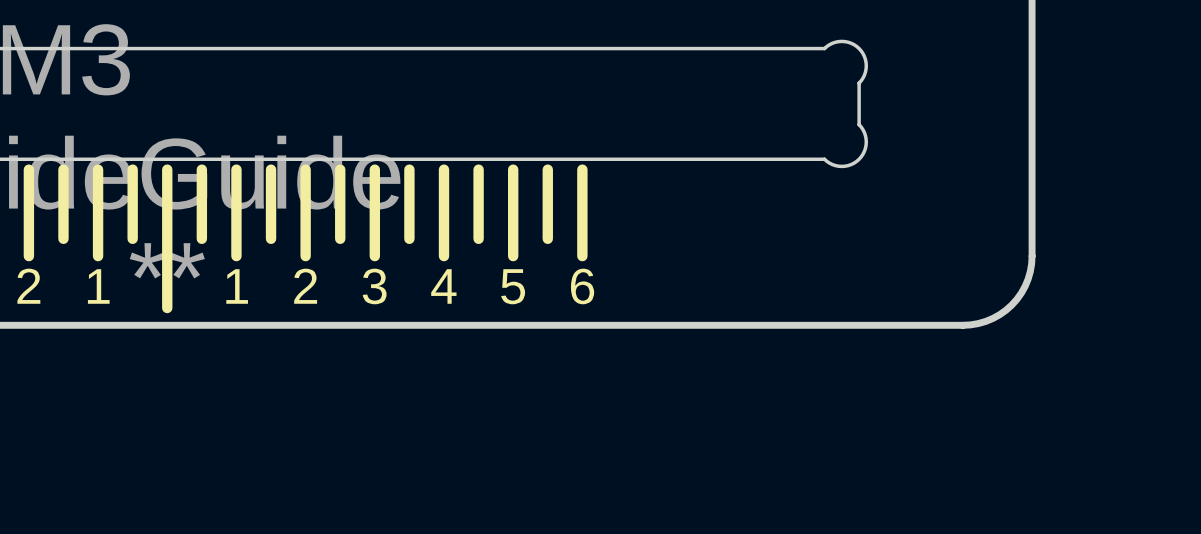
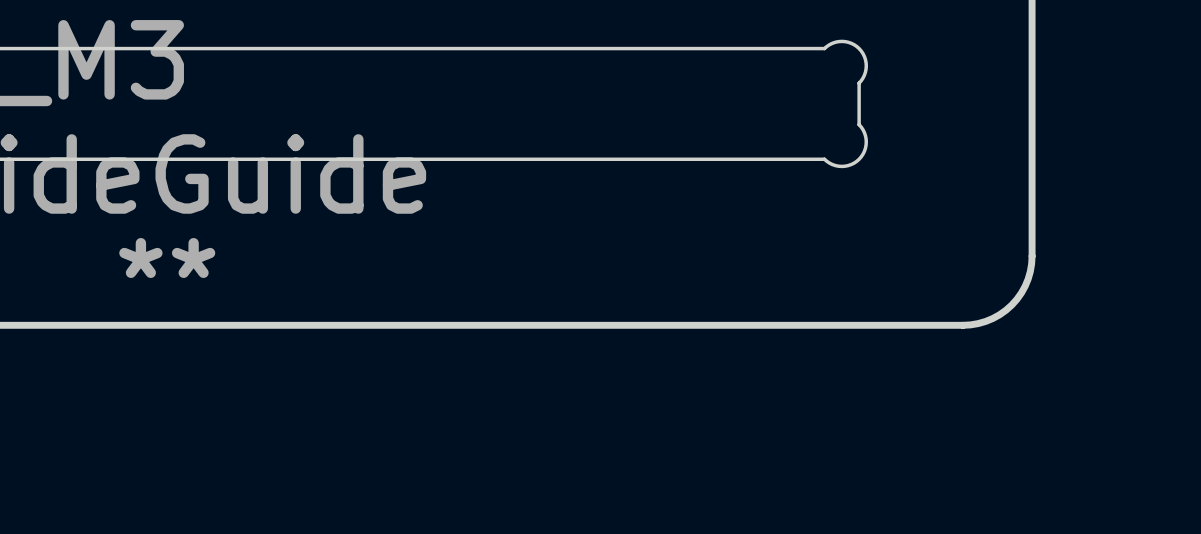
line: (28, 169) (28, 256) -> none
line: (63, 169) (63, 238) -> none
line: (98, 169) (98, 256) -> none
line: (132, 169) (132, 238) -> none
line: (167, 169) (167, 308) -> none
line: (201, 169) (201, 238) -> none
line: (236, 169) (236, 256) -> none
line: (271, 169) (271, 238) -> none
line: (305, 169) (305, 256) -> none
line: (340, 169) (340, 238) -> none
line: (374, 169) (374, 256) -> none
line: (409, 169) (409, 238) -> none
line: (444, 169) (444, 256) -> none
line: (478, 169) (478, 238) -> none
line: (513, 169) (513, 256) -> none
line: (547, 169) (547, 238) -> none
line: (582, 169) (582, 256) -> none
text: 2 (28, 286) -> none
text: 1 (98, 286) -> none
text: 1 (237, 286) -> none
text: 2 (305, 286) -> none
text: 3 (374, 286) -> none
text: 4 (443, 286) -> none
text: 5 (513, 286) -> none
text: 6 (582, 286) -> none

